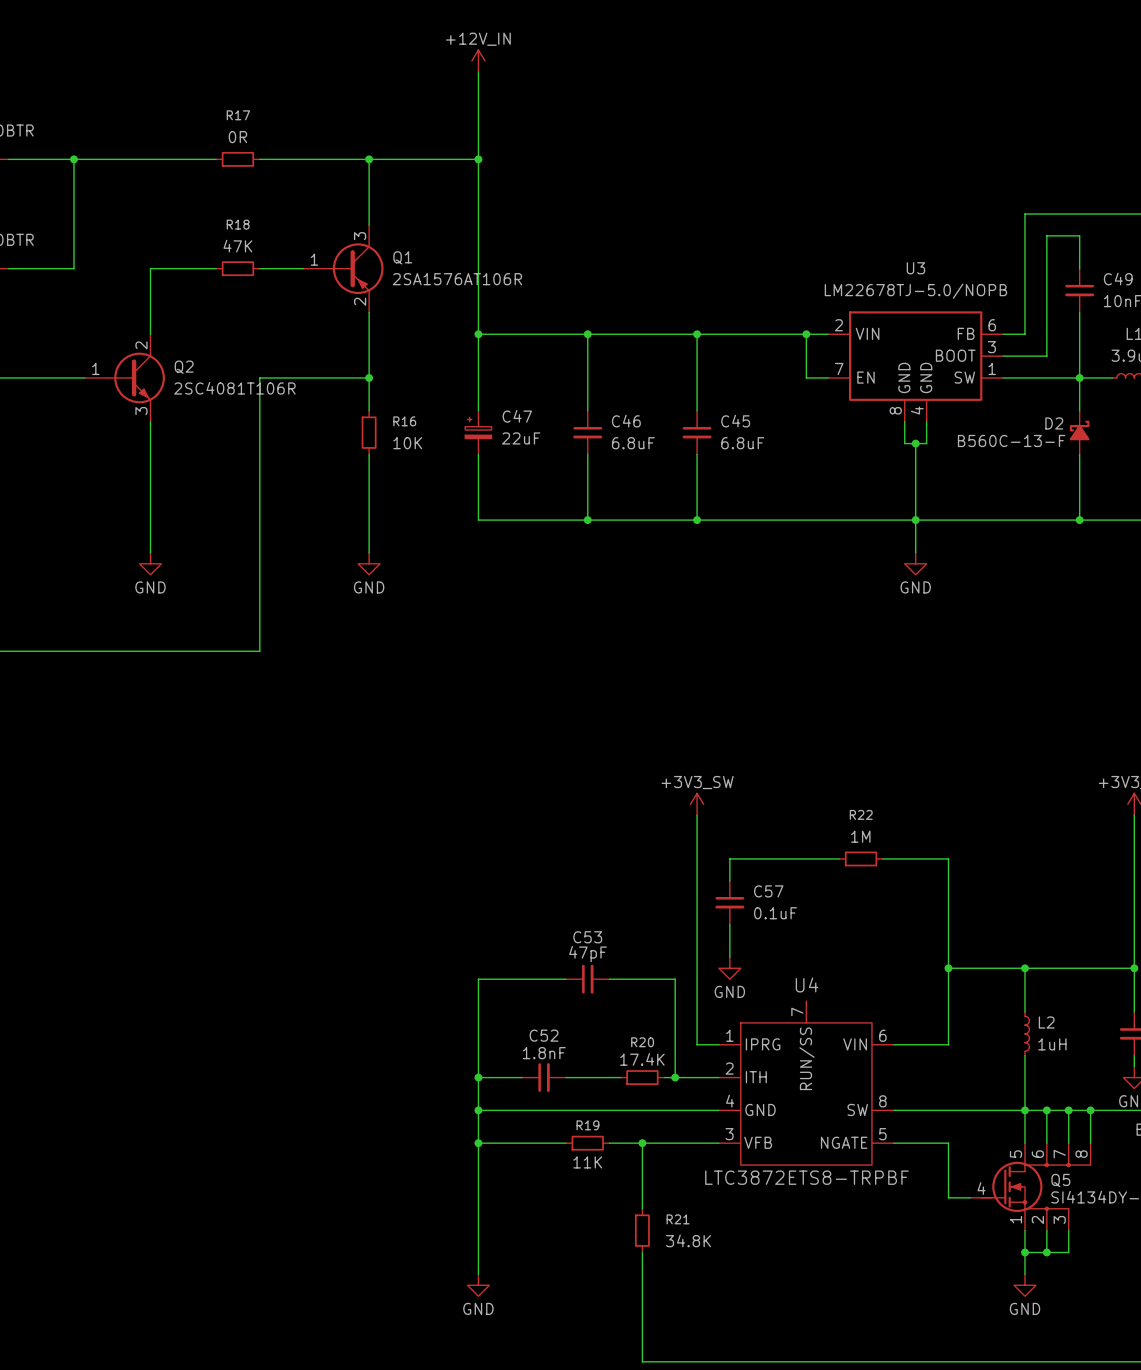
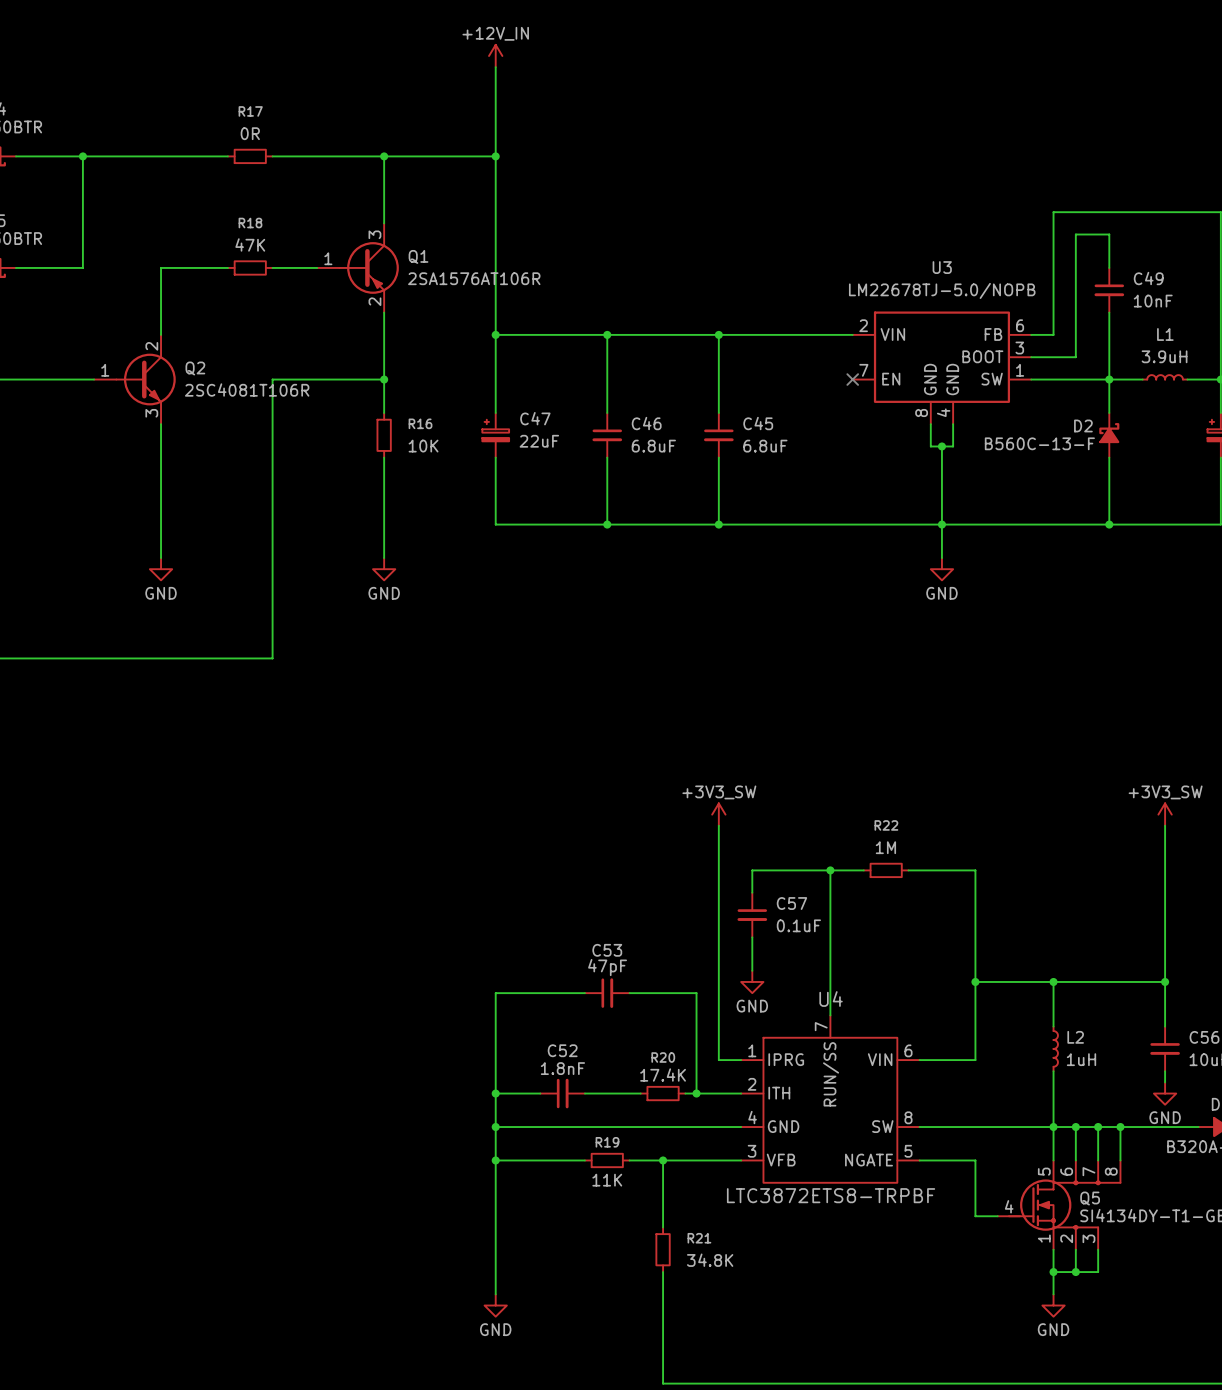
wire: (806, 334) (806, 377) (828, 377) -> none
junction: (806, 334) -> none
no-connect mark: none -> (852, 379)
wire: none -> (830, 870) (830, 1015)
junction: none -> (830, 870)

